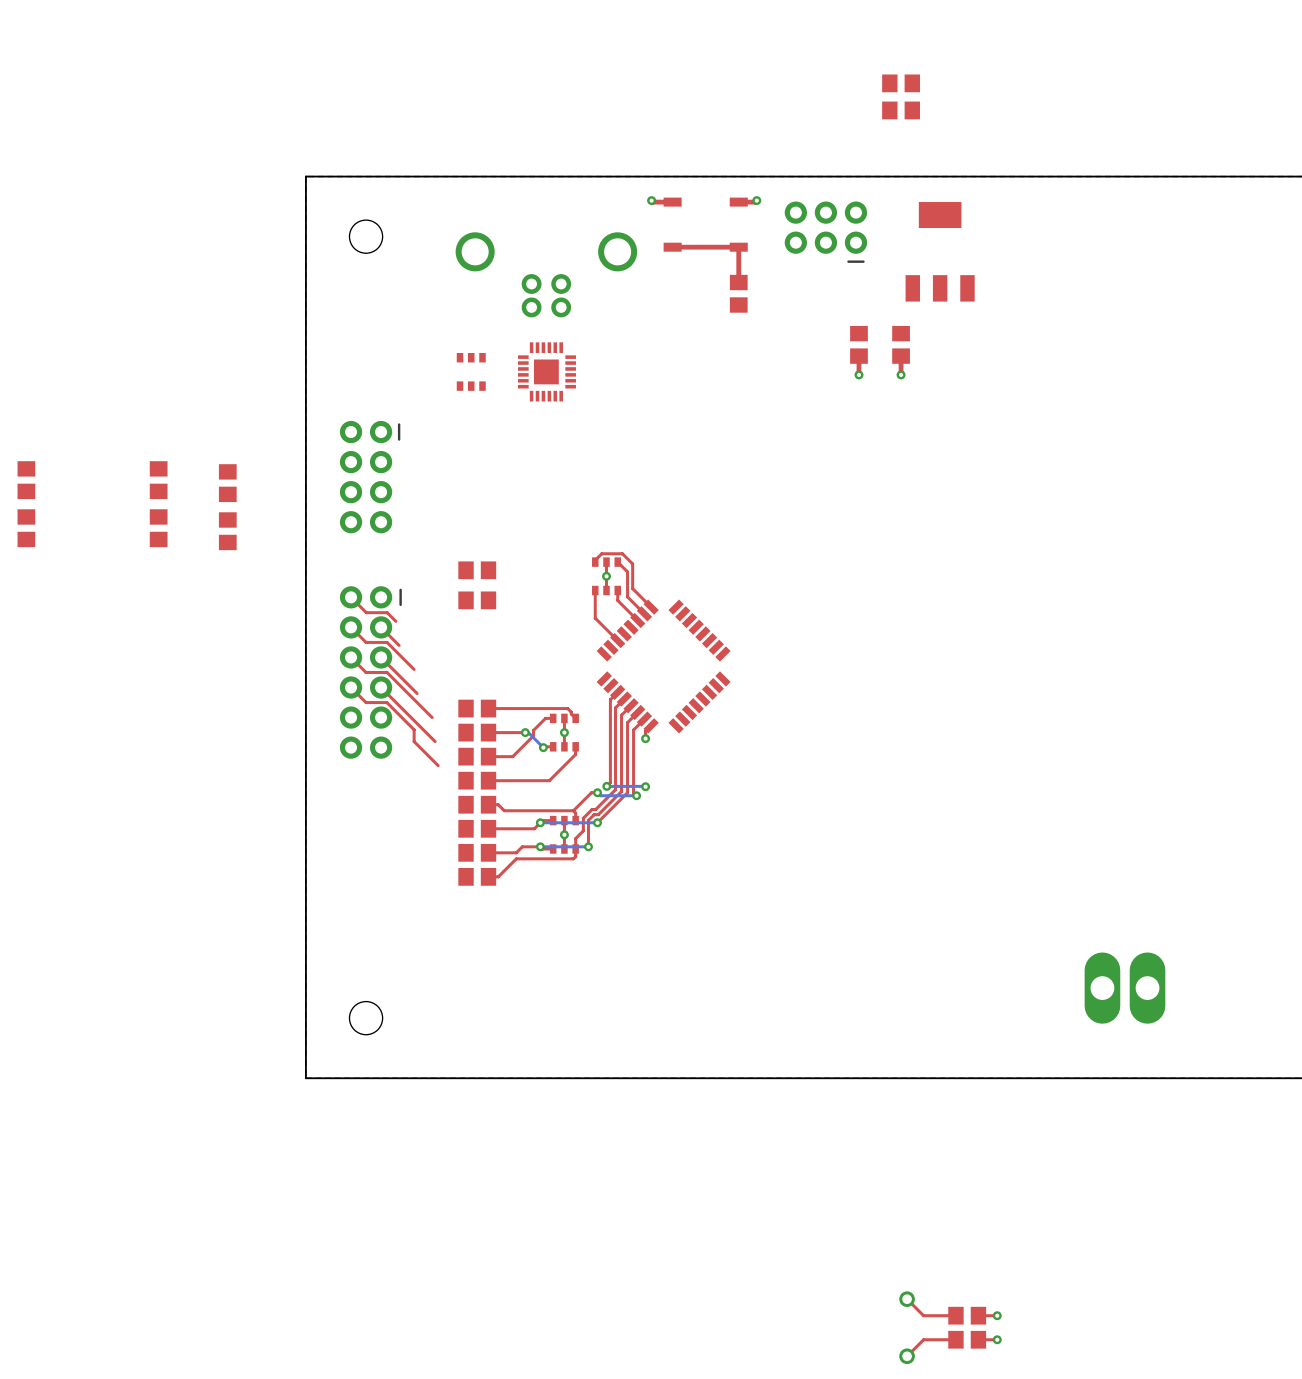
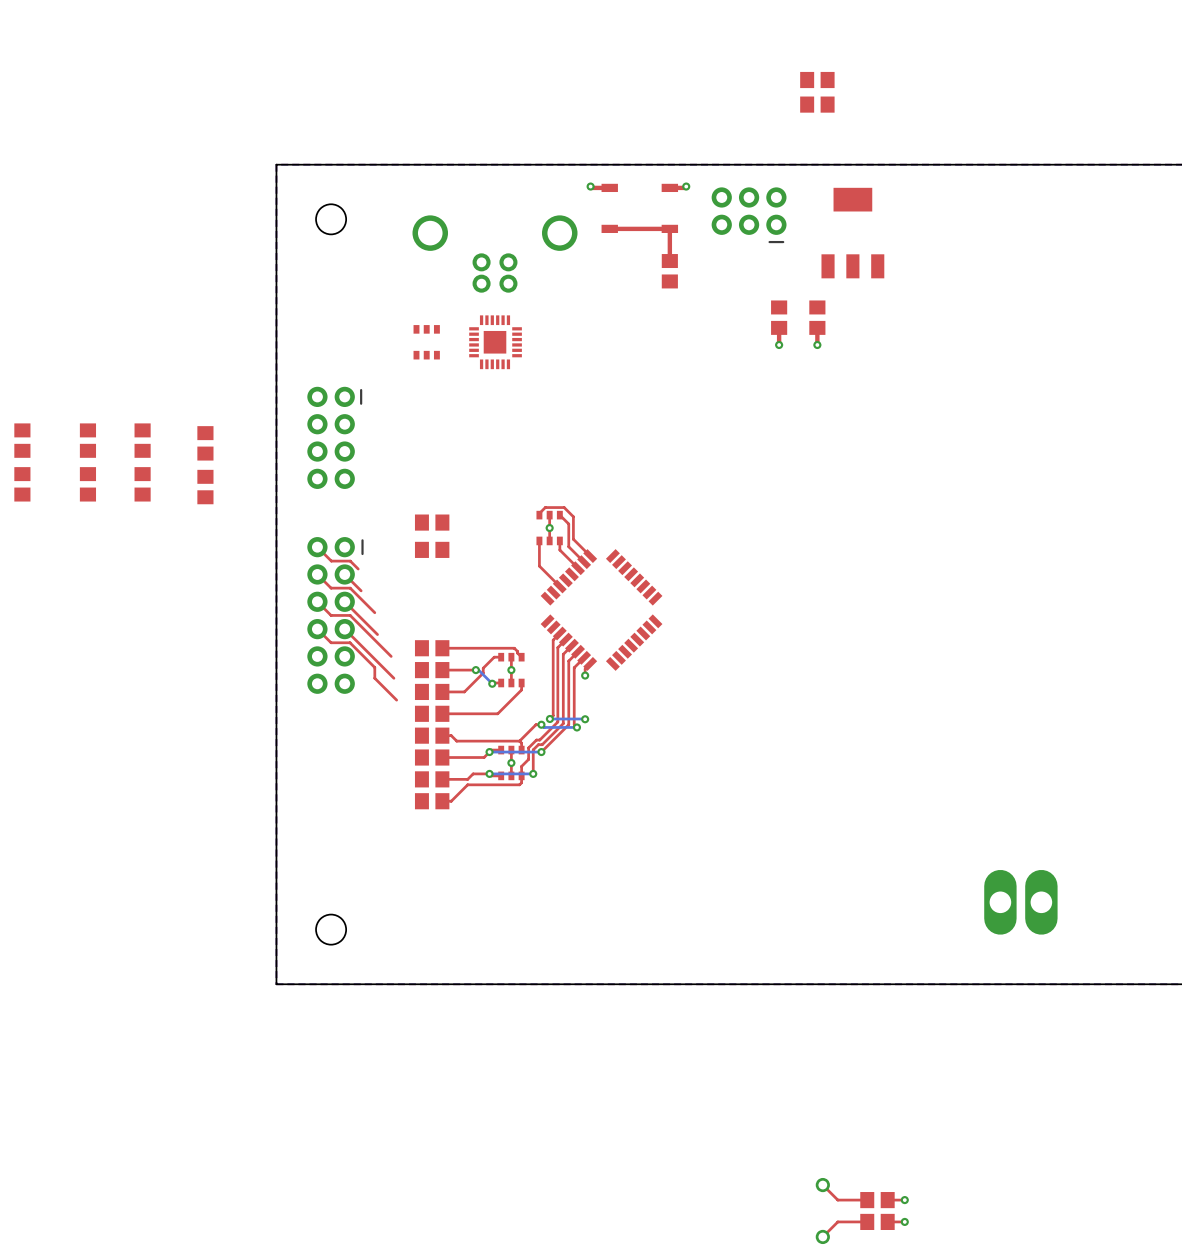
part: none -> (87, 440)
part: none -> (87, 484)

